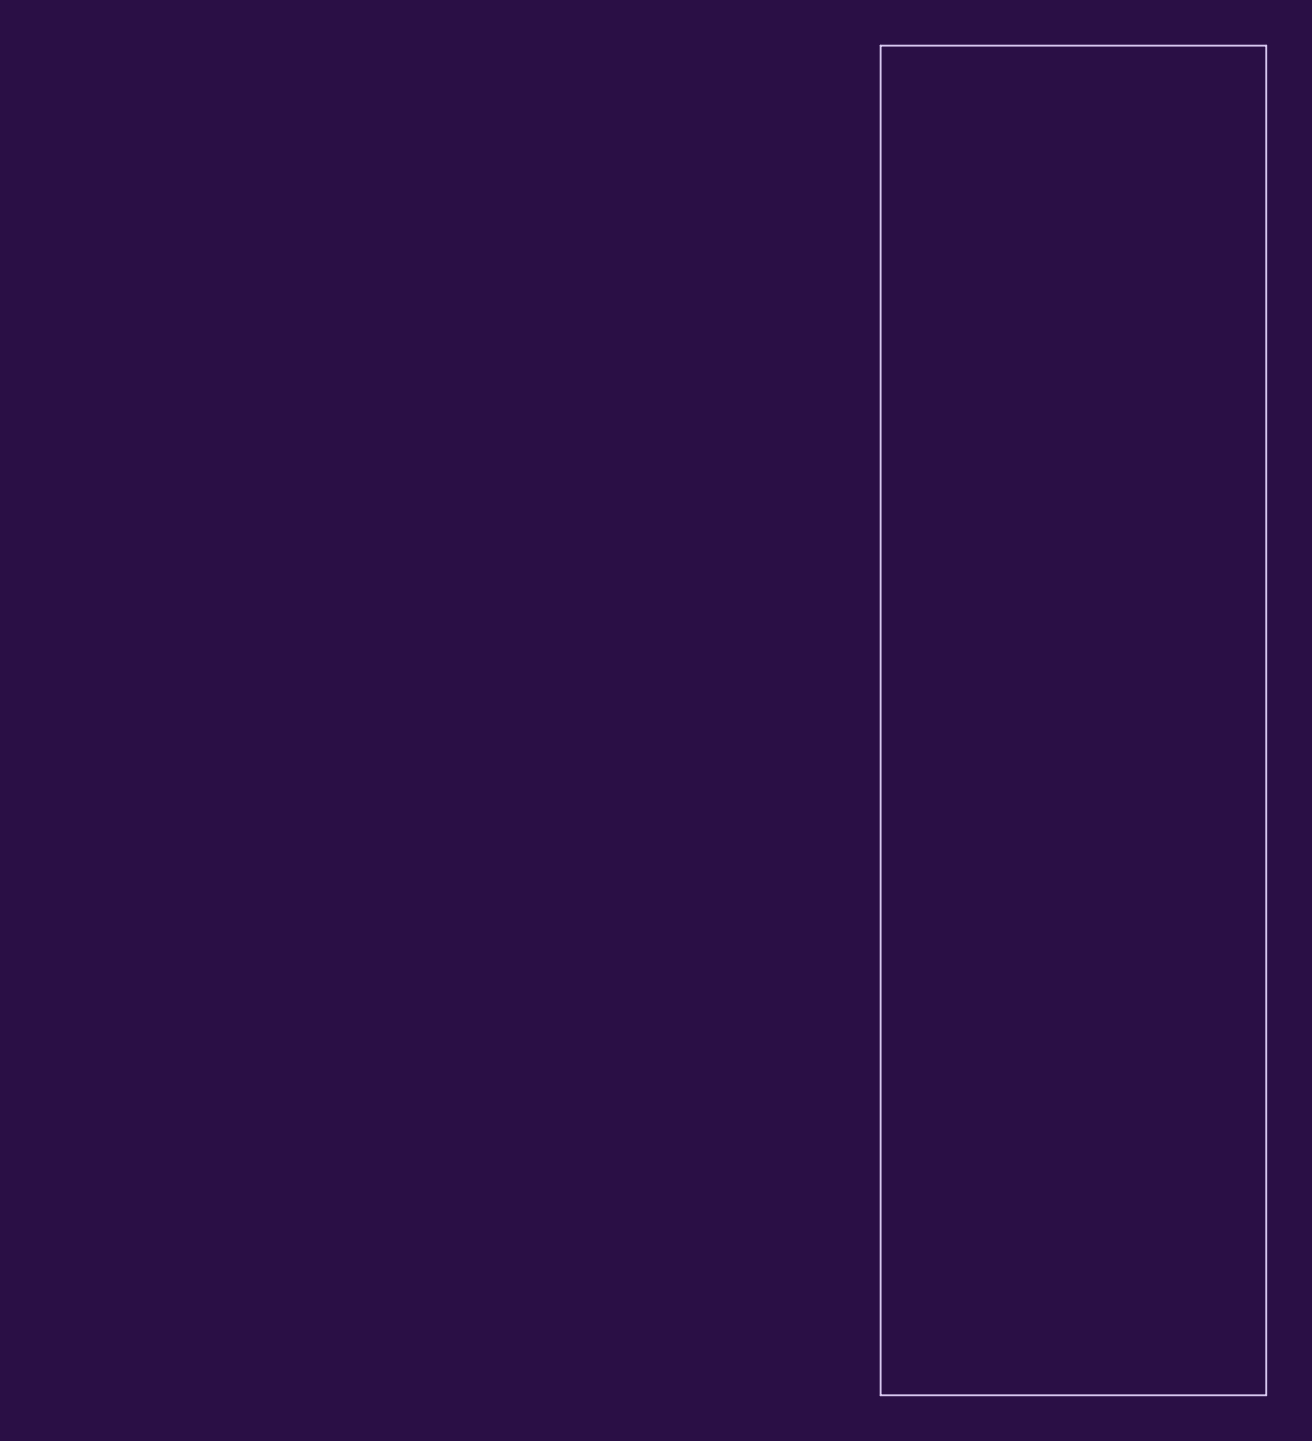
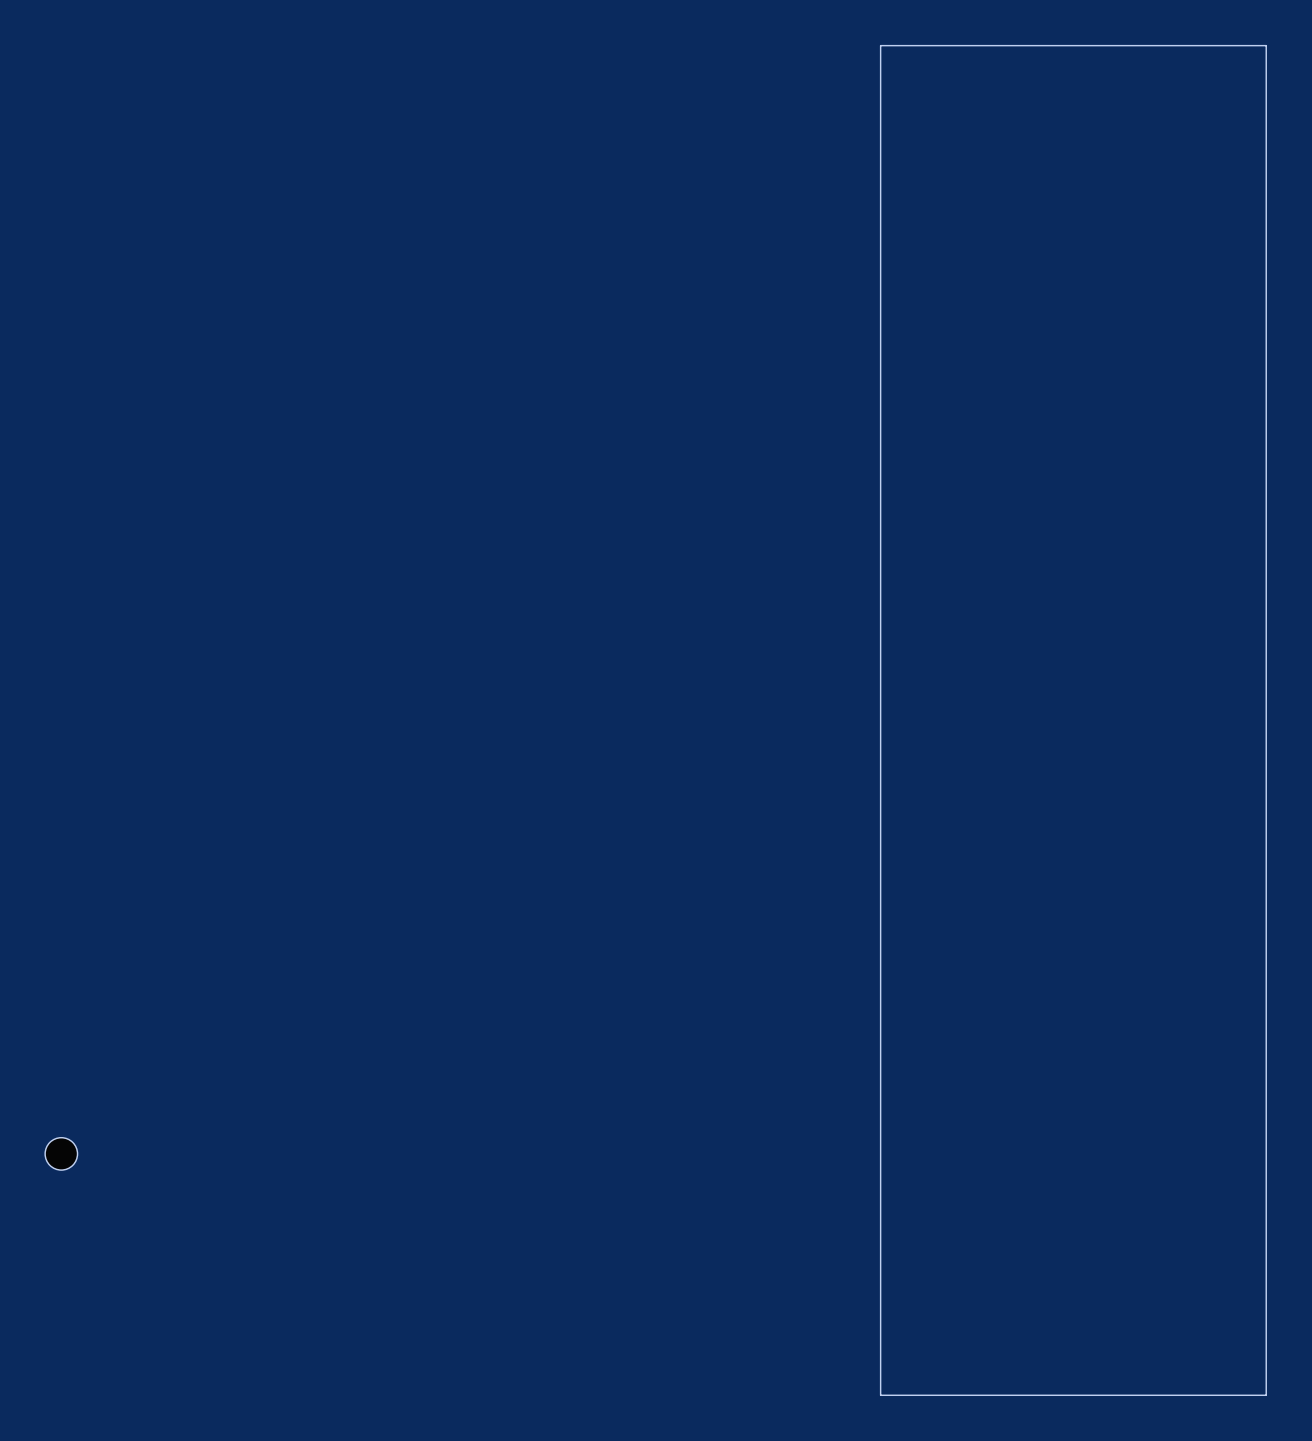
part: none -> (61, 1153)

